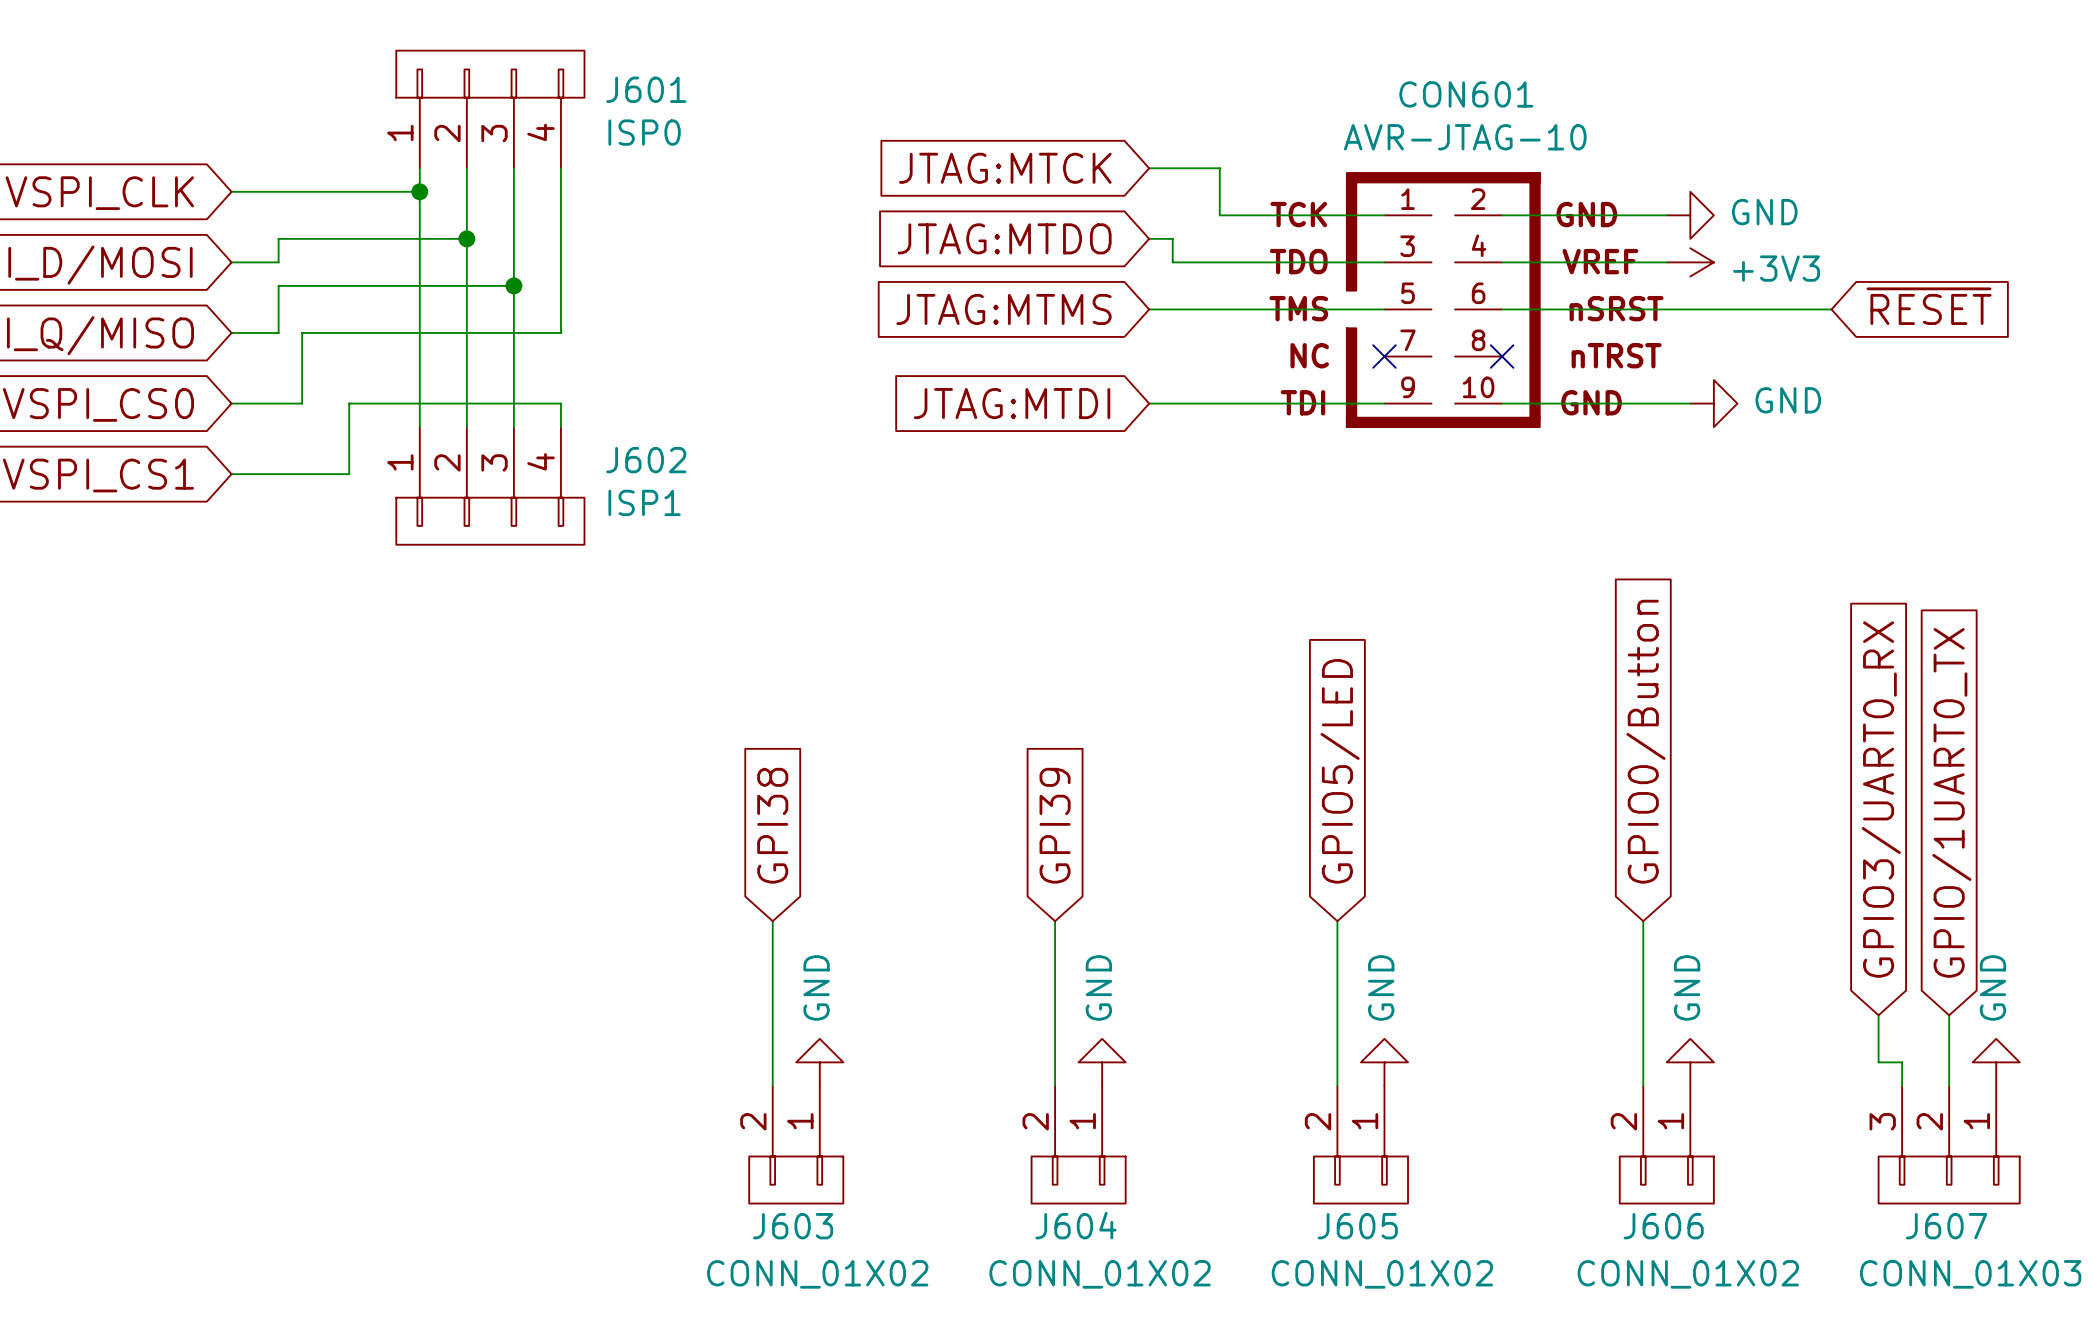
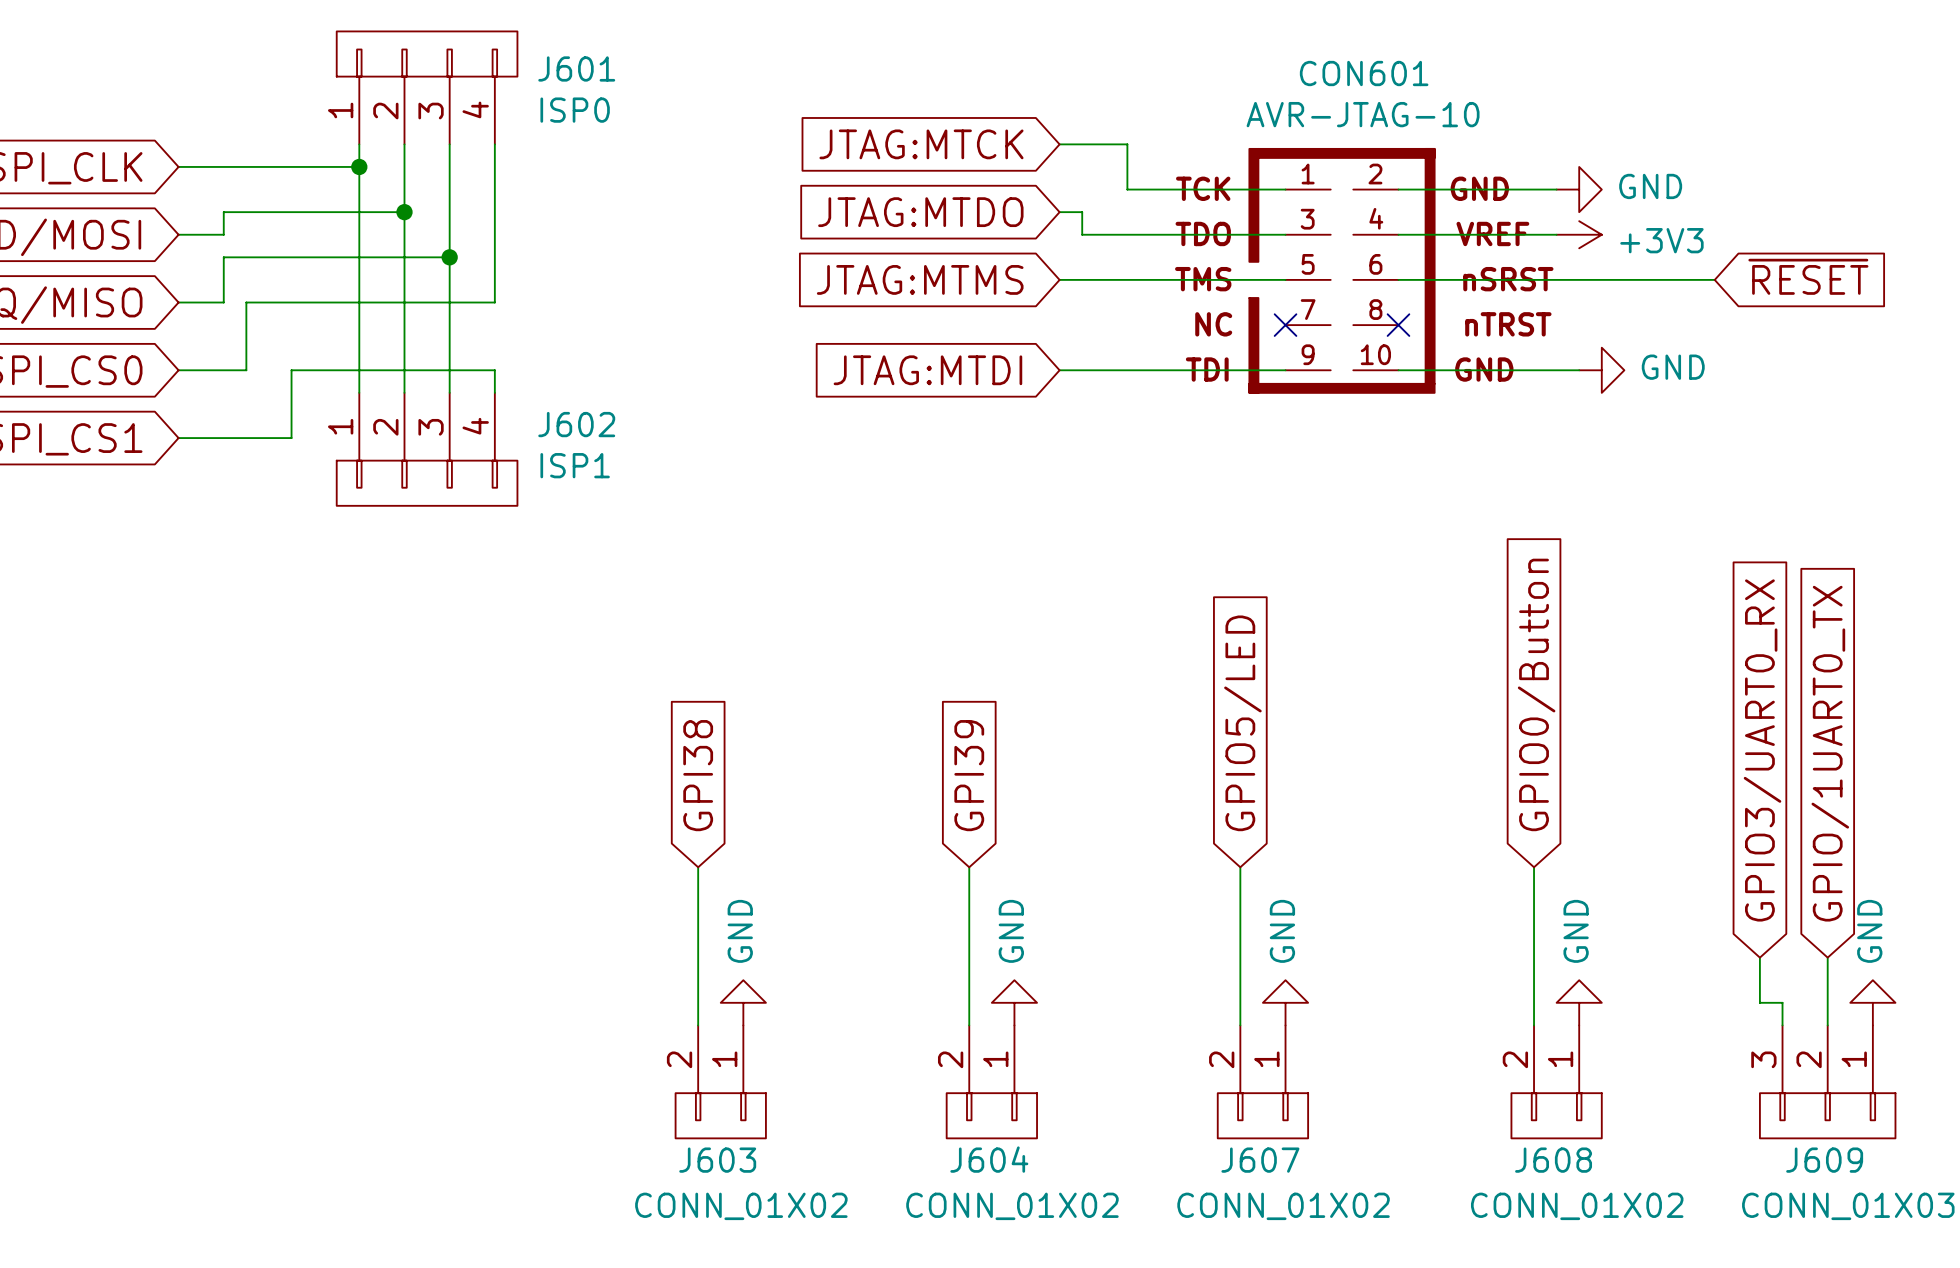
J605 name: J605 (1357, 1226) -> J607 (1260, 1160)
J606 name: J606 (1663, 1226) -> J608 (1553, 1160)
J607 name: J607 (1946, 1226) -> J609 (1824, 1160)

